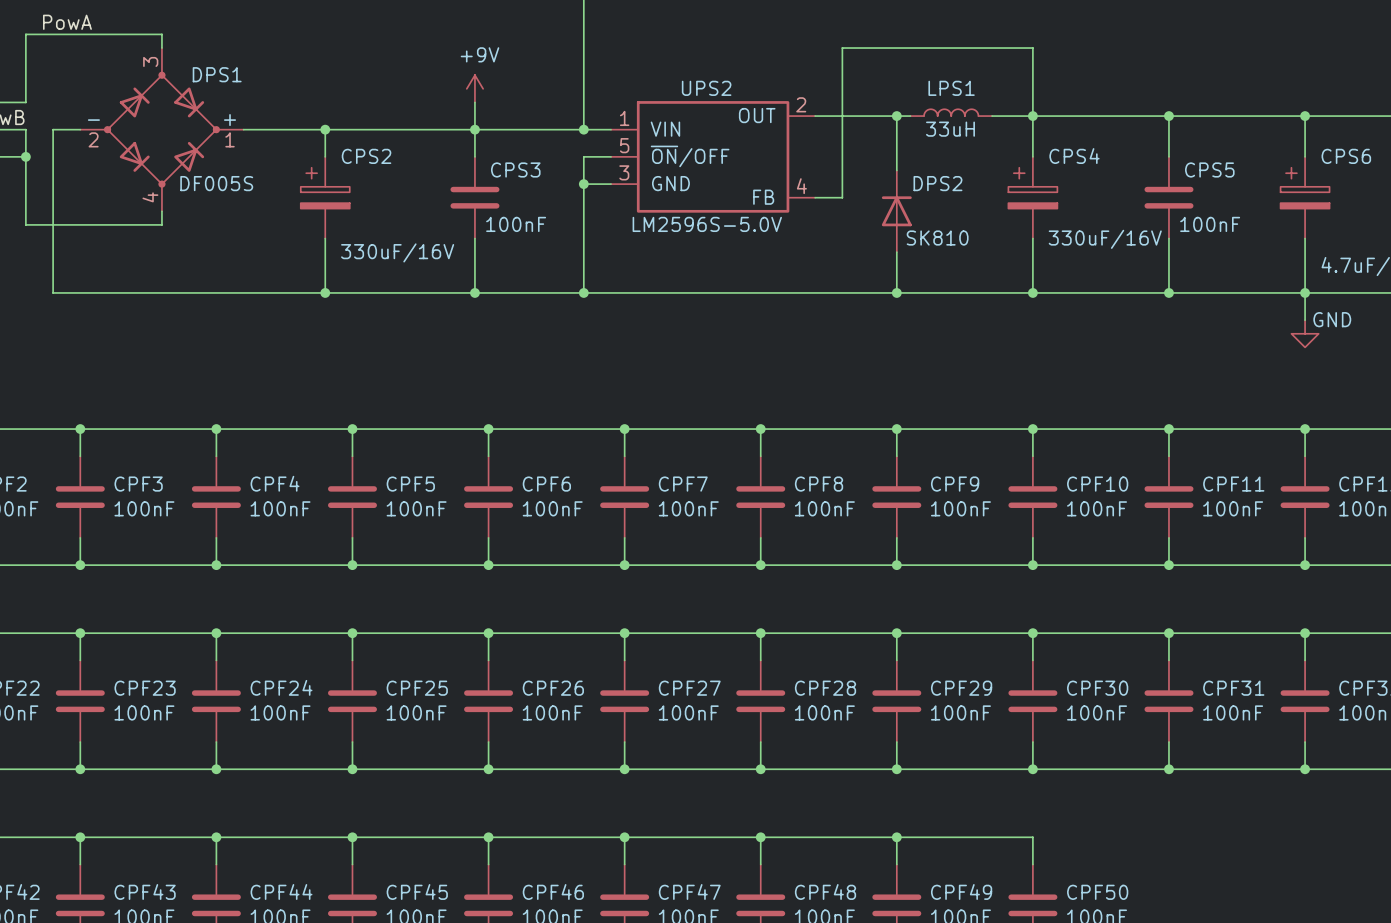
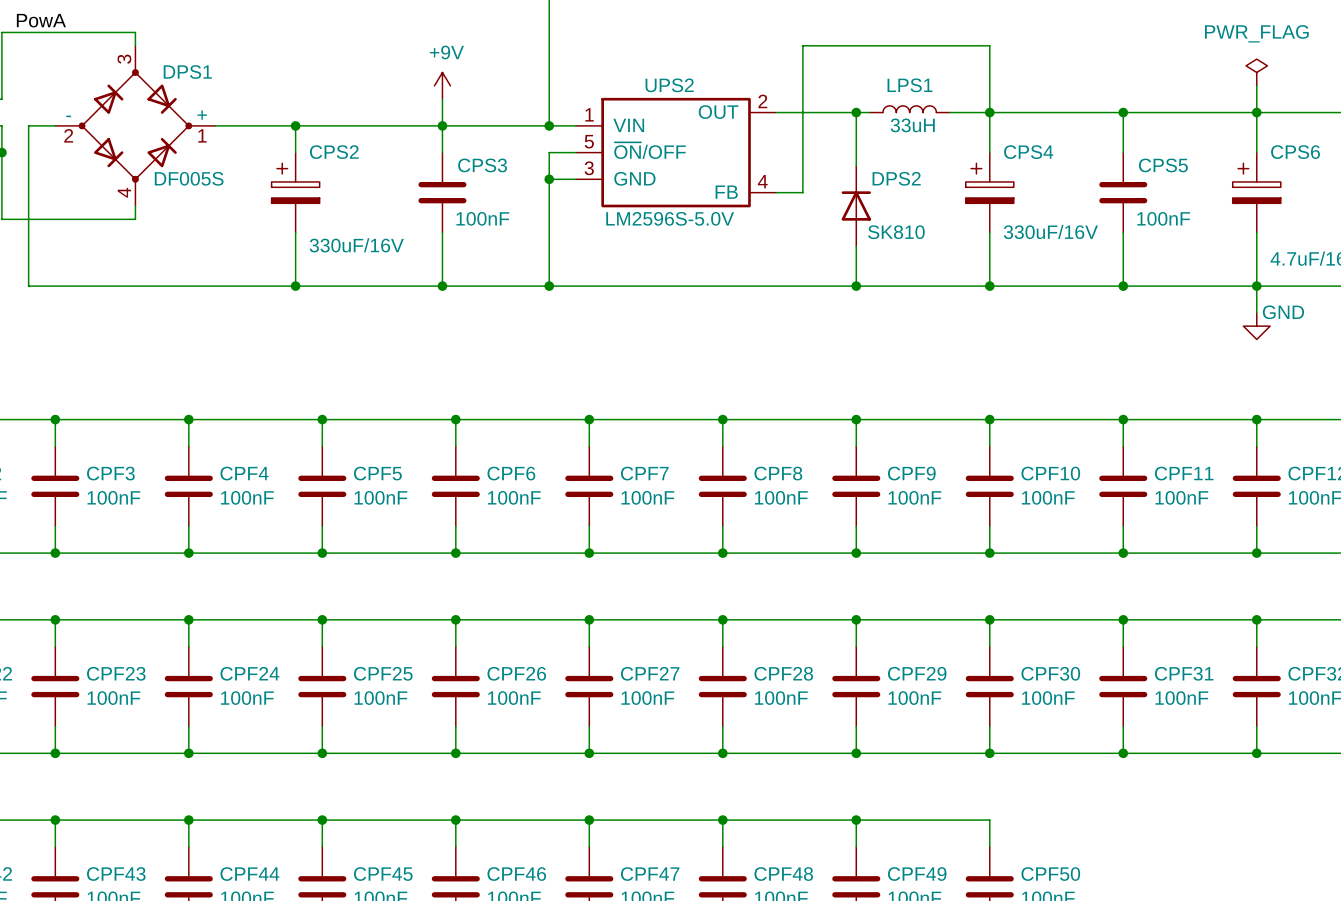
power symbol: none -> PWR_FLAG (1256, 72)
wire: none -> (1256, 85) (1256, 112)

